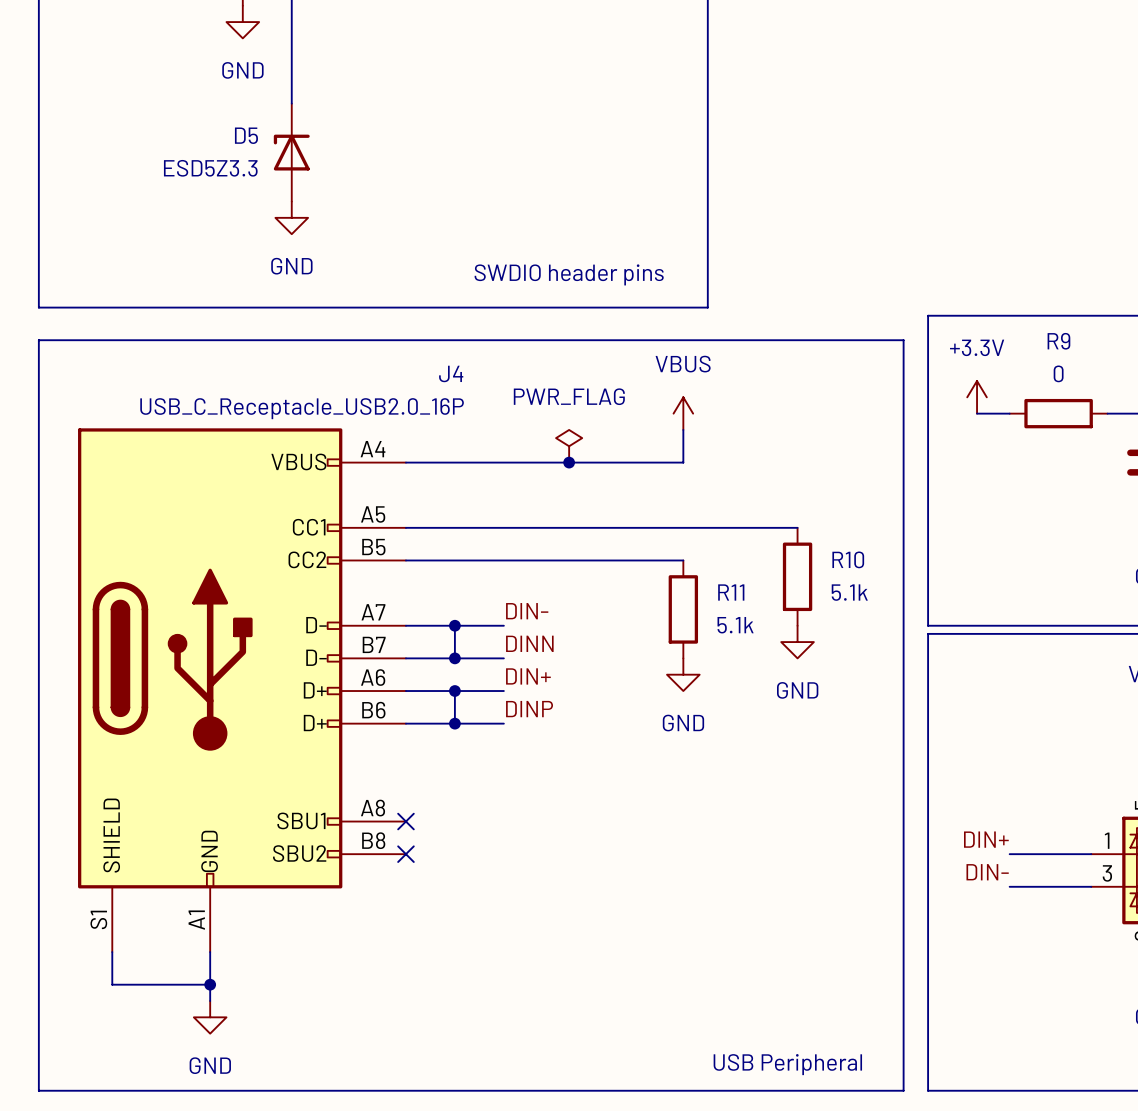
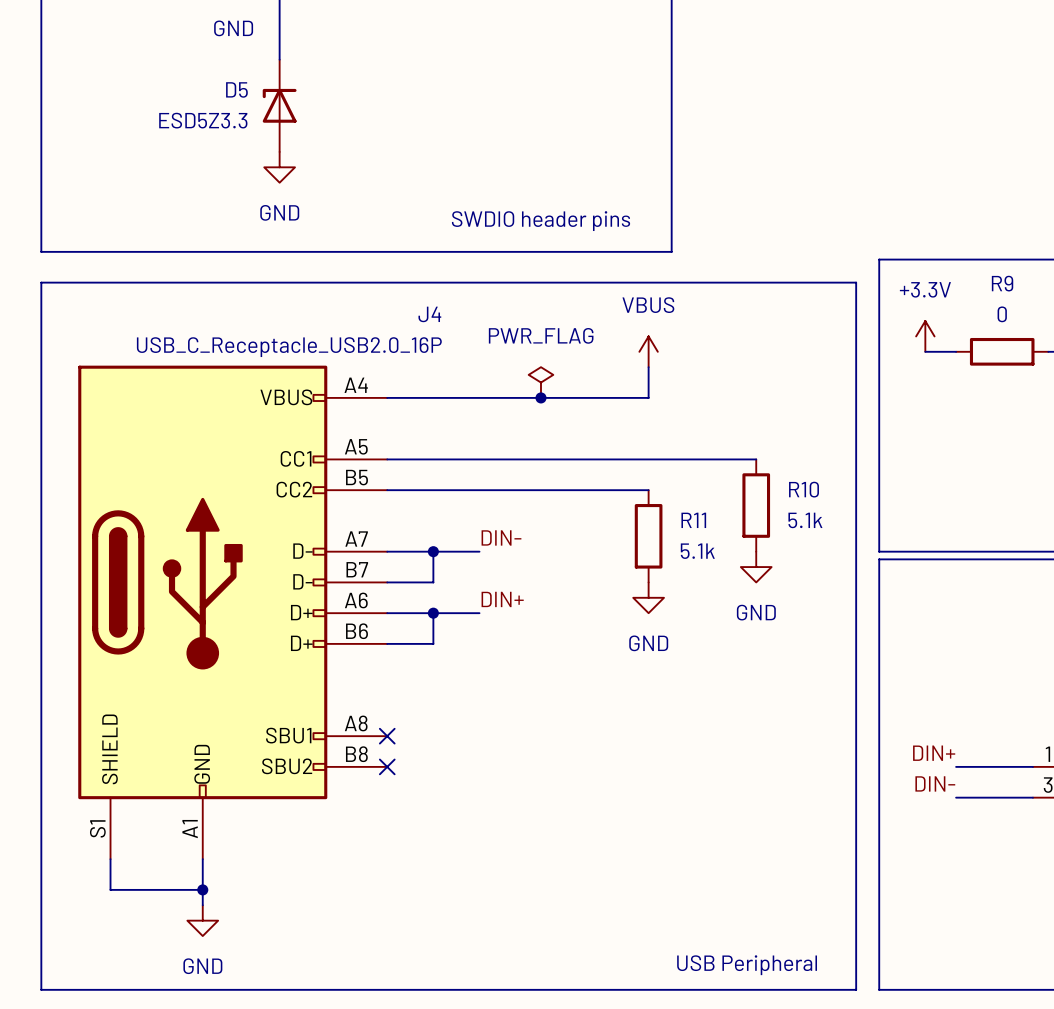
label: DINN (529, 643) -> none
wire: (454, 658) (503, 658) -> none
junction: (454, 658) -> none
label: DINP (529, 709) -> none
wire: (454, 723) (503, 723) -> none
junction: (454, 723) -> none

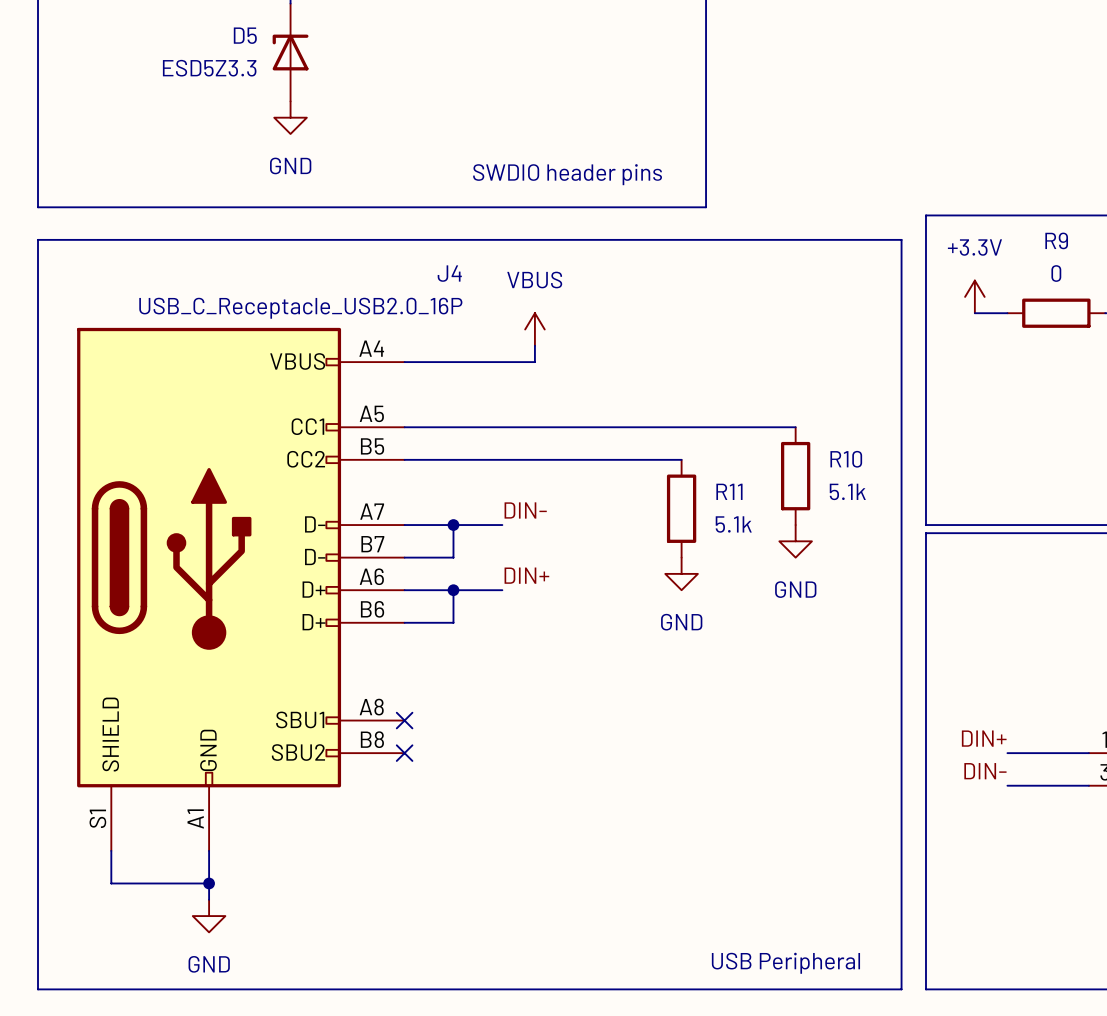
power symbol position: VBUS (648, 351) -> VBUS (534, 329)
wire: (648, 367) (648, 397) (510, 397) -> (534, 345) (534, 362)
power symbol: PWR_FLAG (540, 382) -> none
junction: (540, 397) -> none

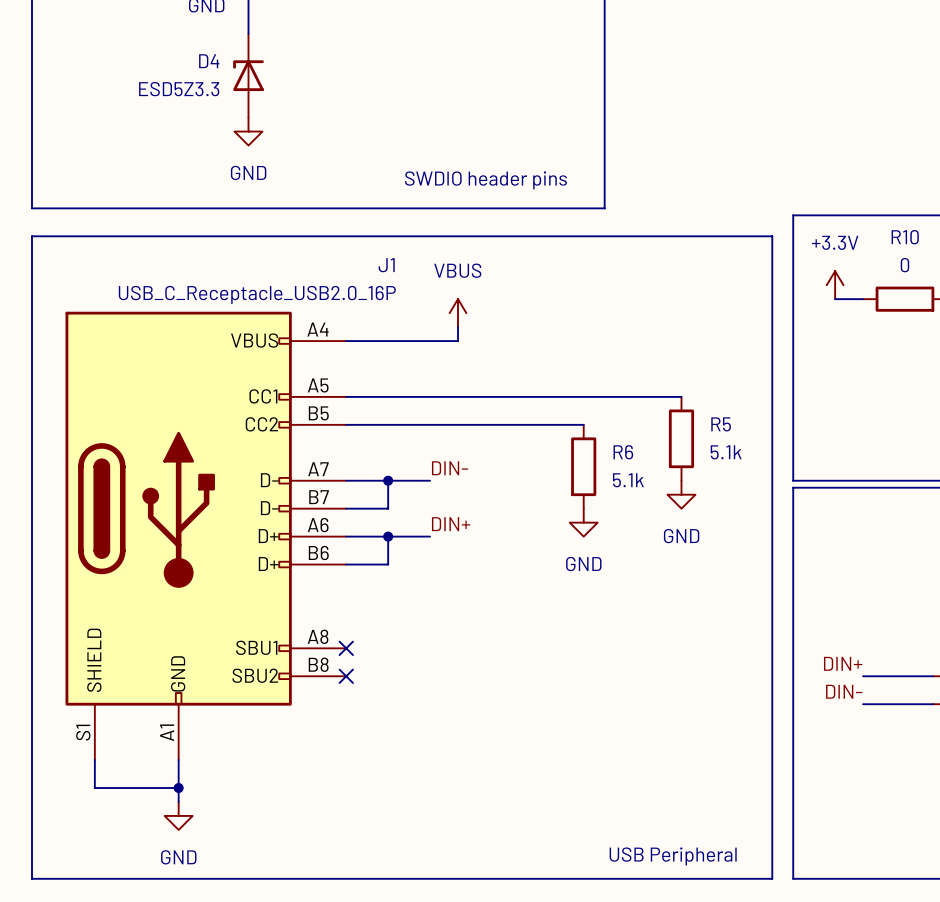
D5 name: D5 (245, 35) -> D4 (209, 61)
R9 name: R9 (1056, 240) -> R10 (905, 237)
J4 name: J4 (449, 273) -> J1 (386, 265)
R10 name: R10 (846, 459) -> R5 (721, 424)
R11 name: R11 (729, 491) -> R6 (623, 452)

